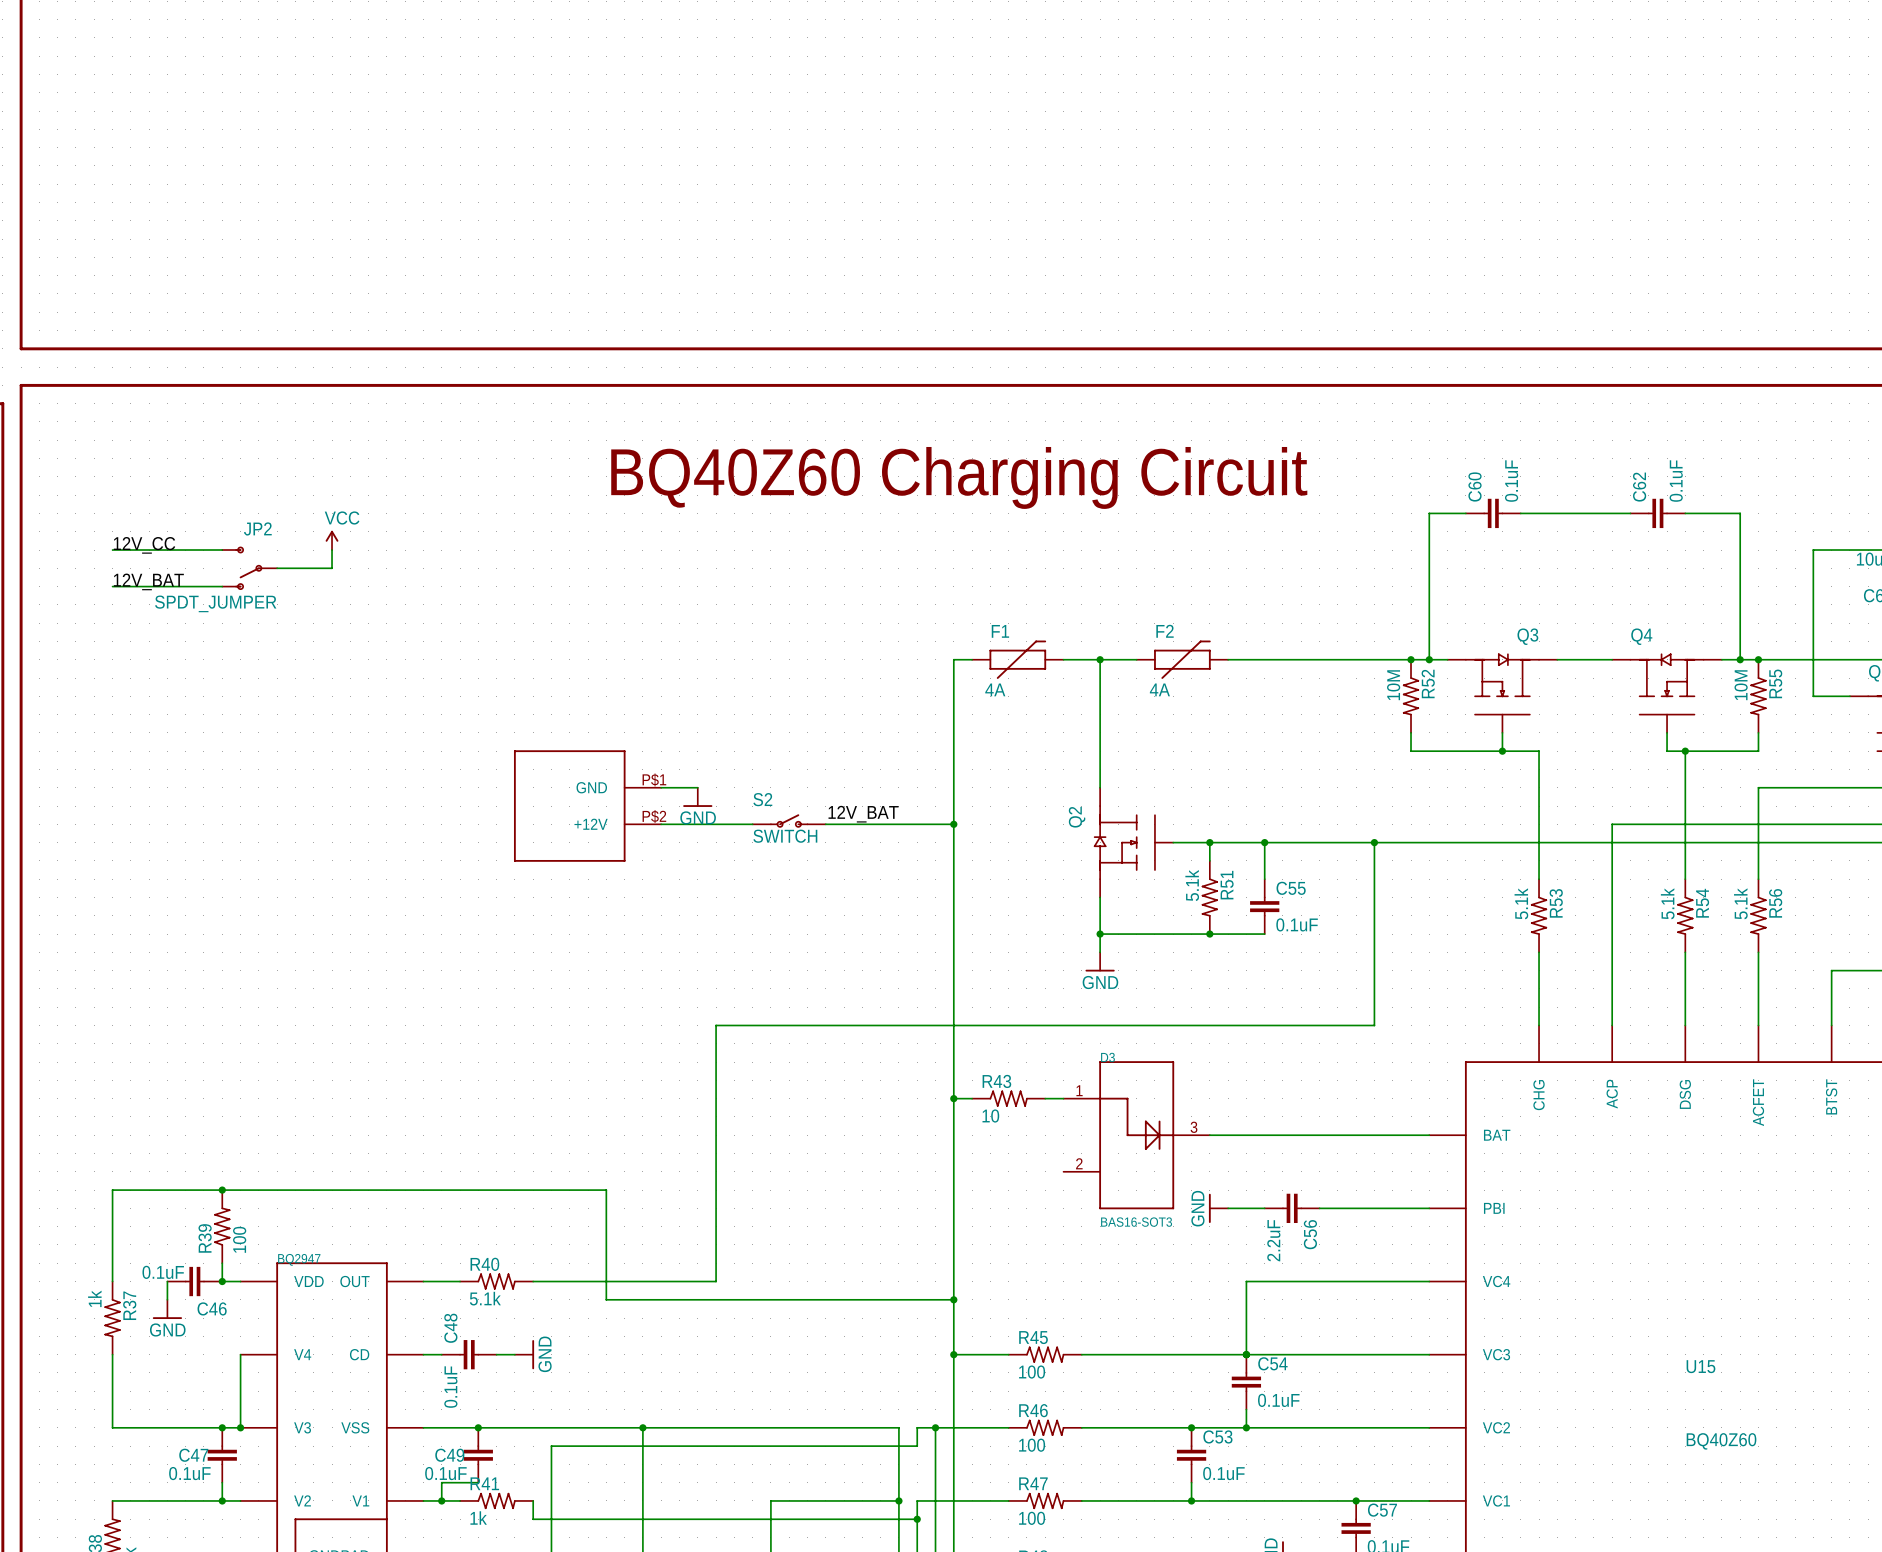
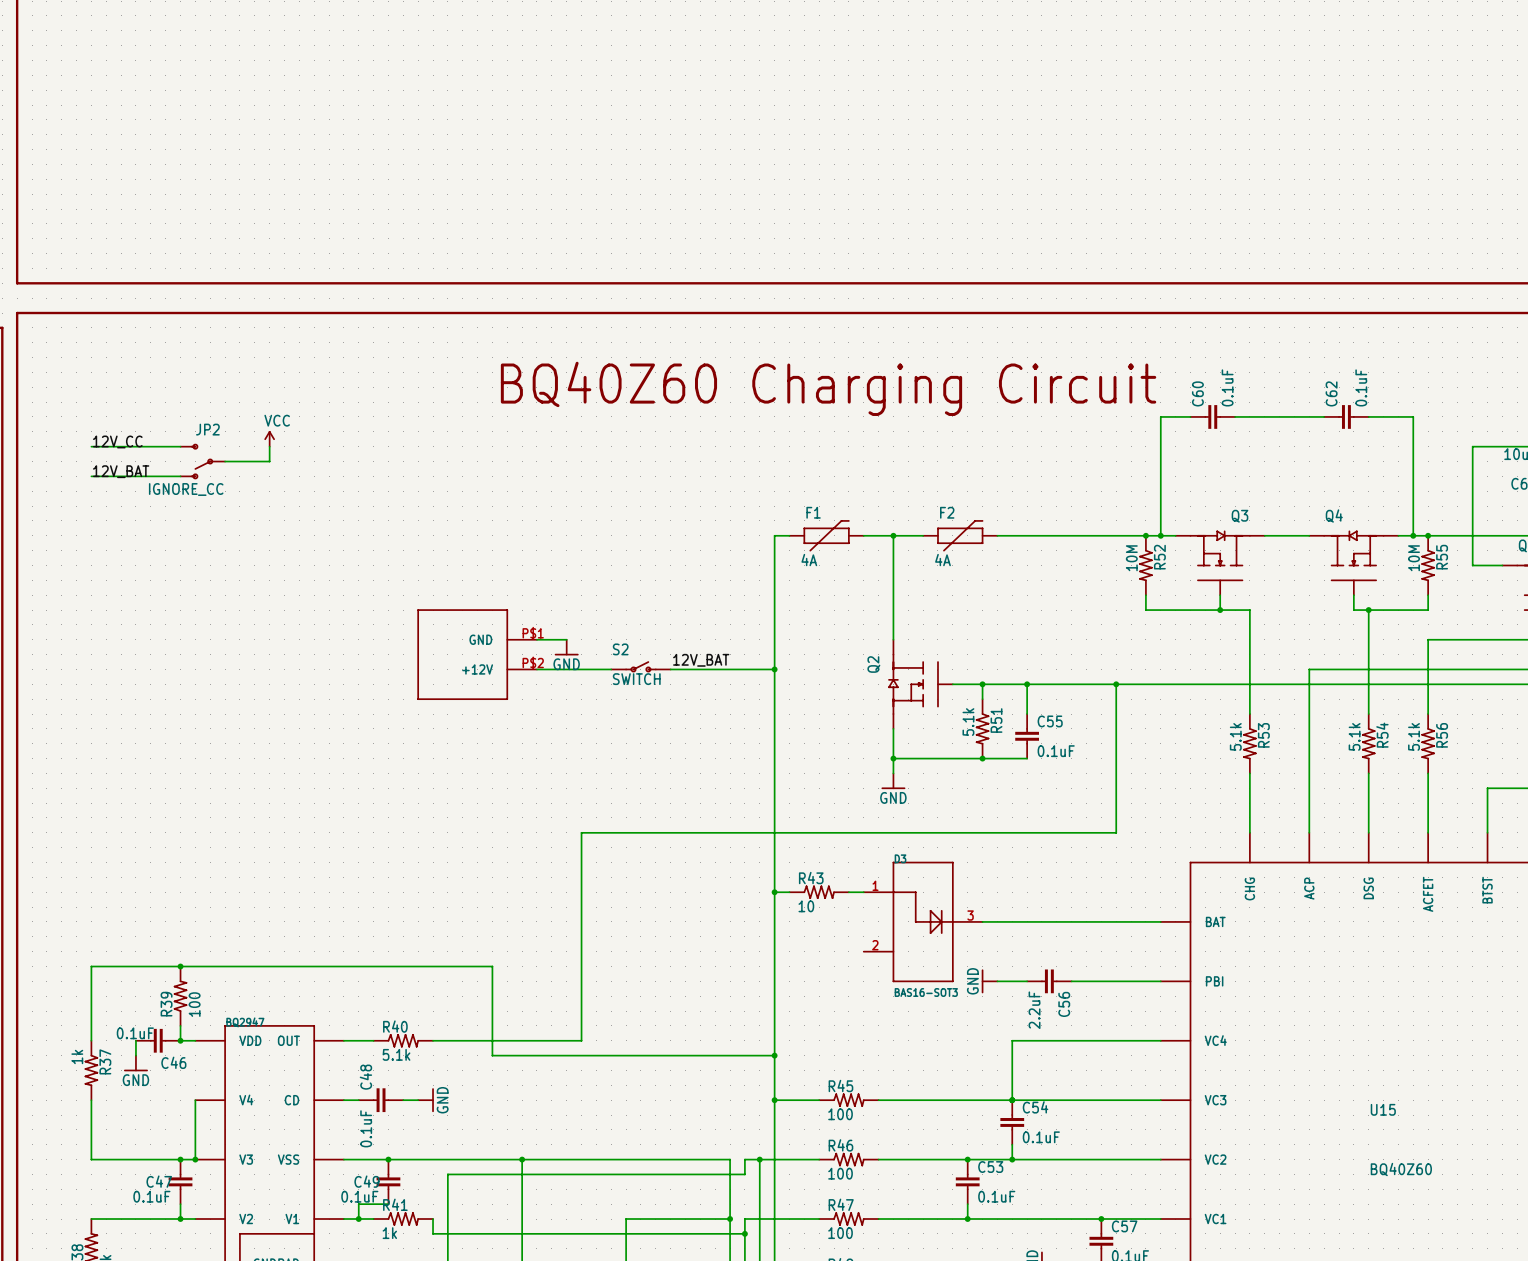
JP2 value: SPDT_JUMPER (215, 603) -> IGNORE_CC (186, 489)

